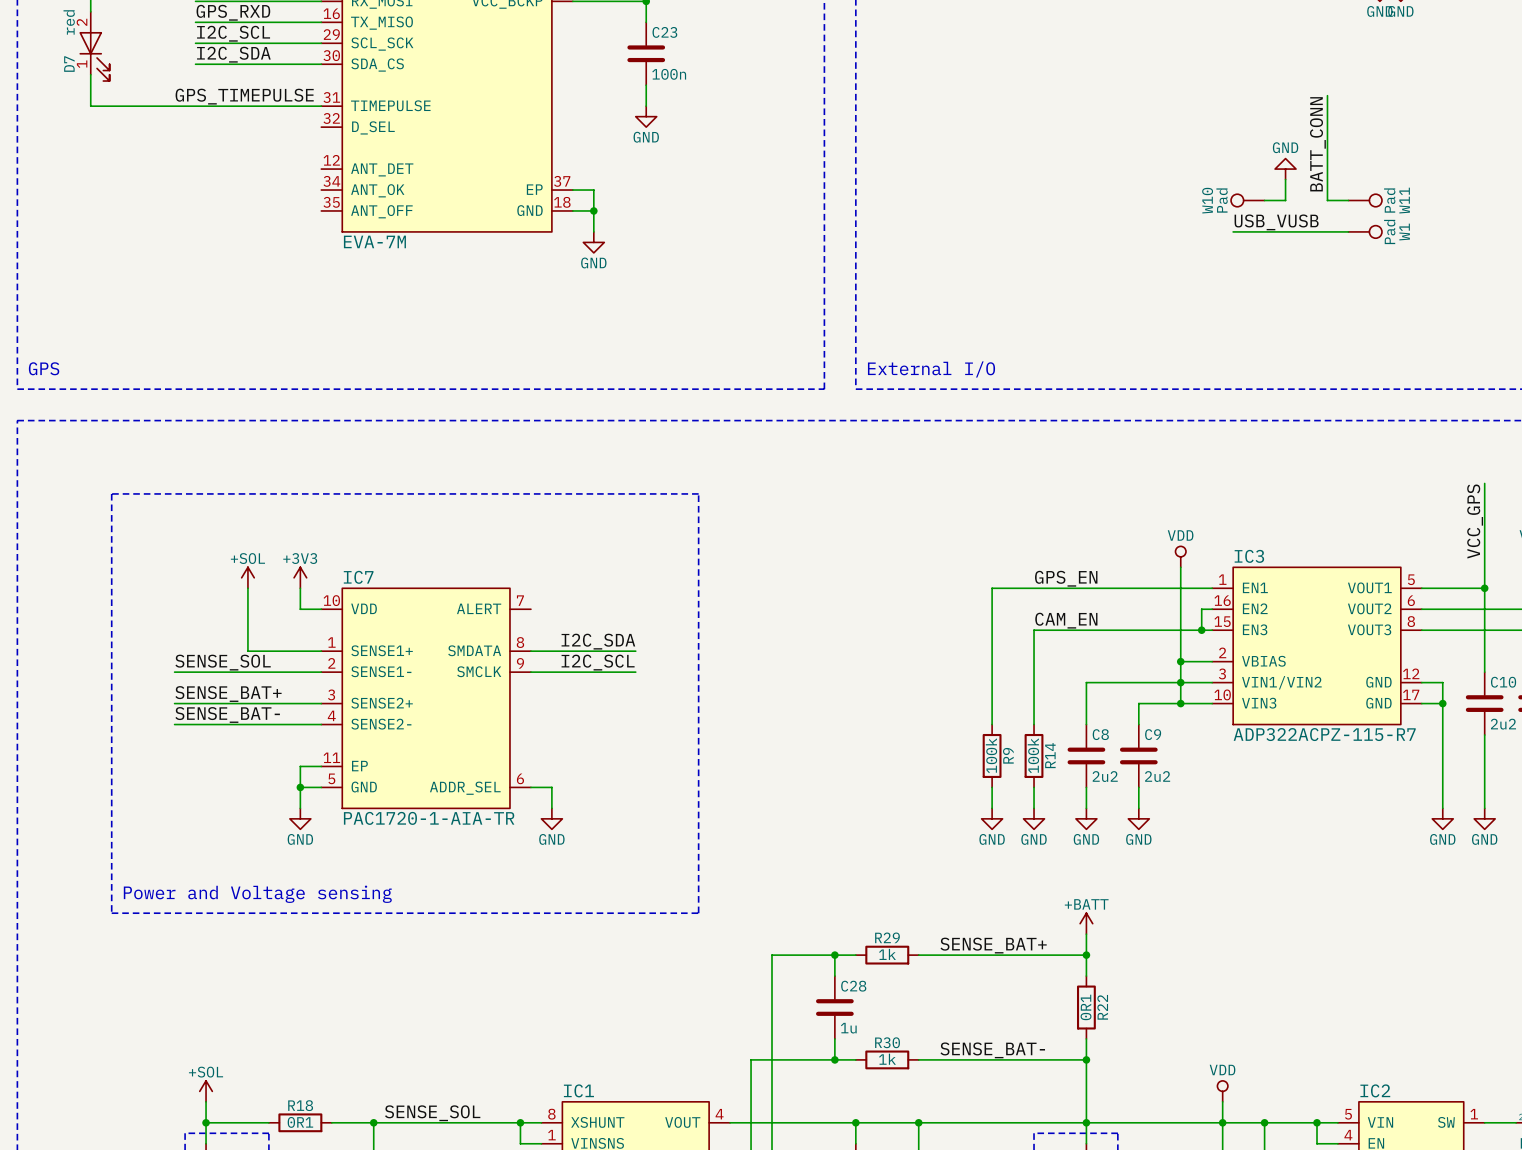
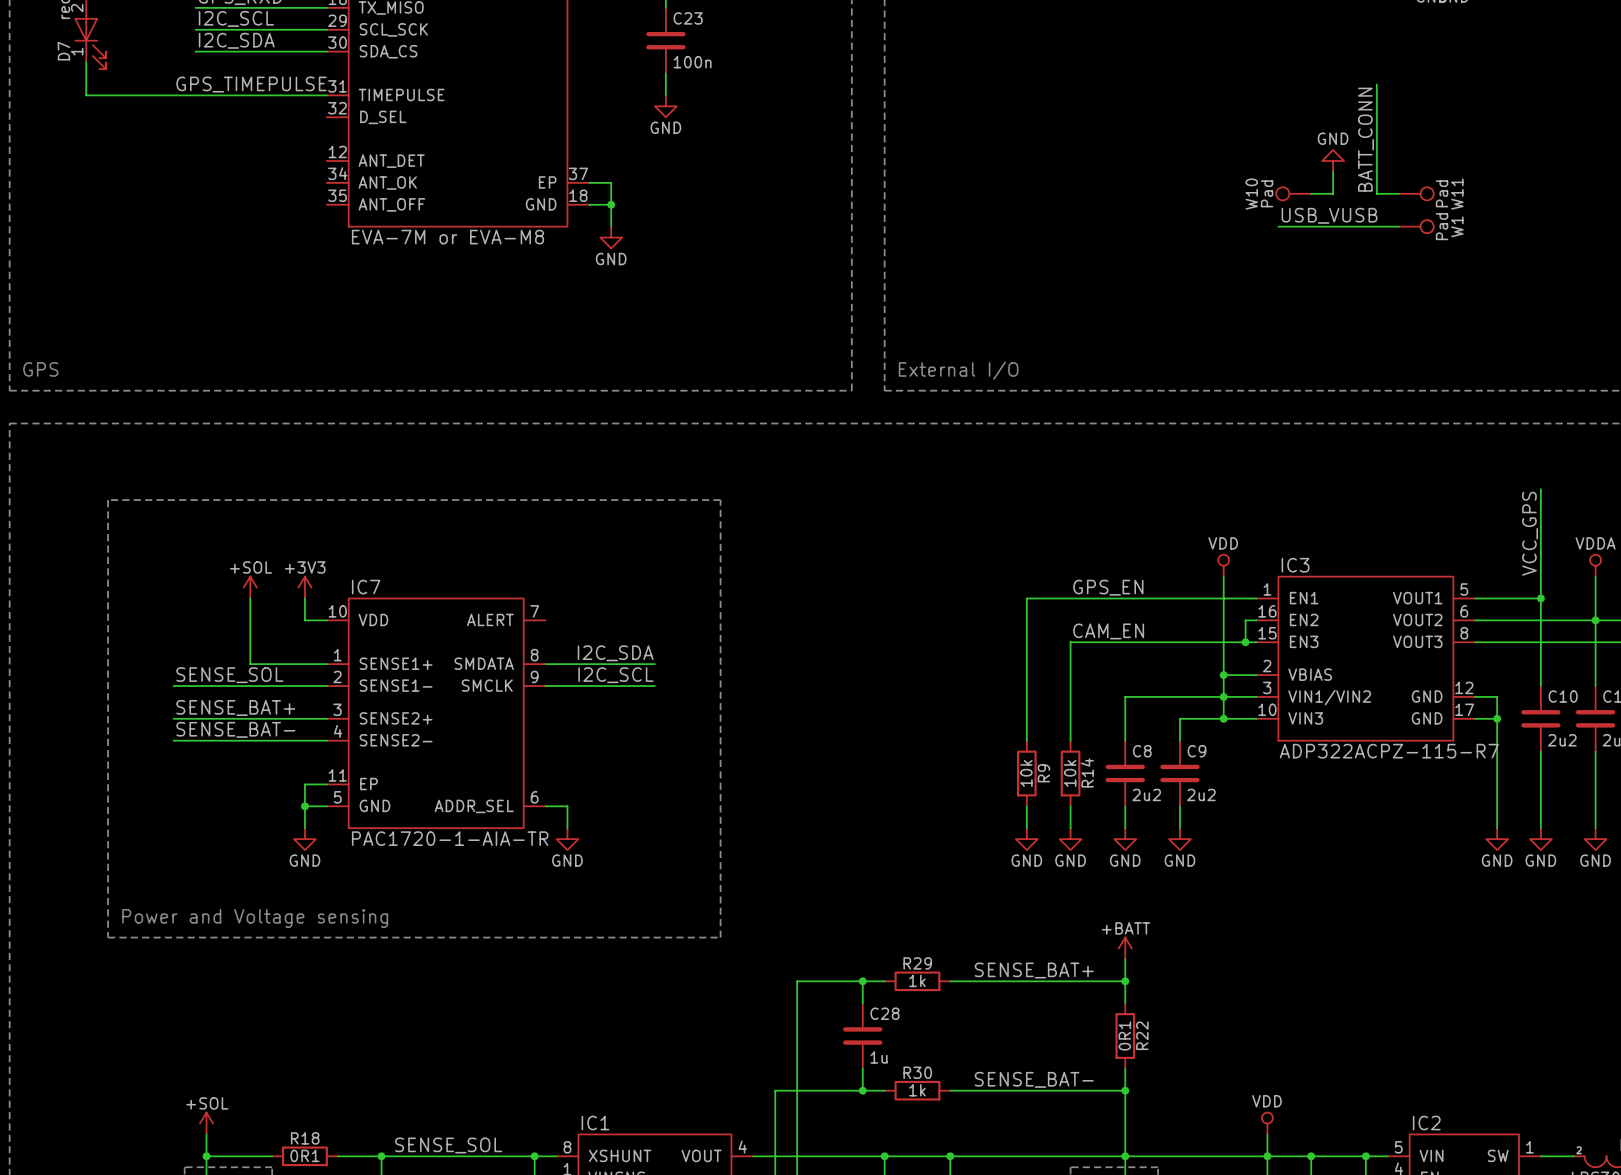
part value: EVA-7M (374, 241) -> EVA-7M or EVA-M8 (448, 237)
R9 value: 100k (991, 755) -> 10k (1026, 773)
R14 value: 100k (1033, 755) -> 10k (1070, 773)

